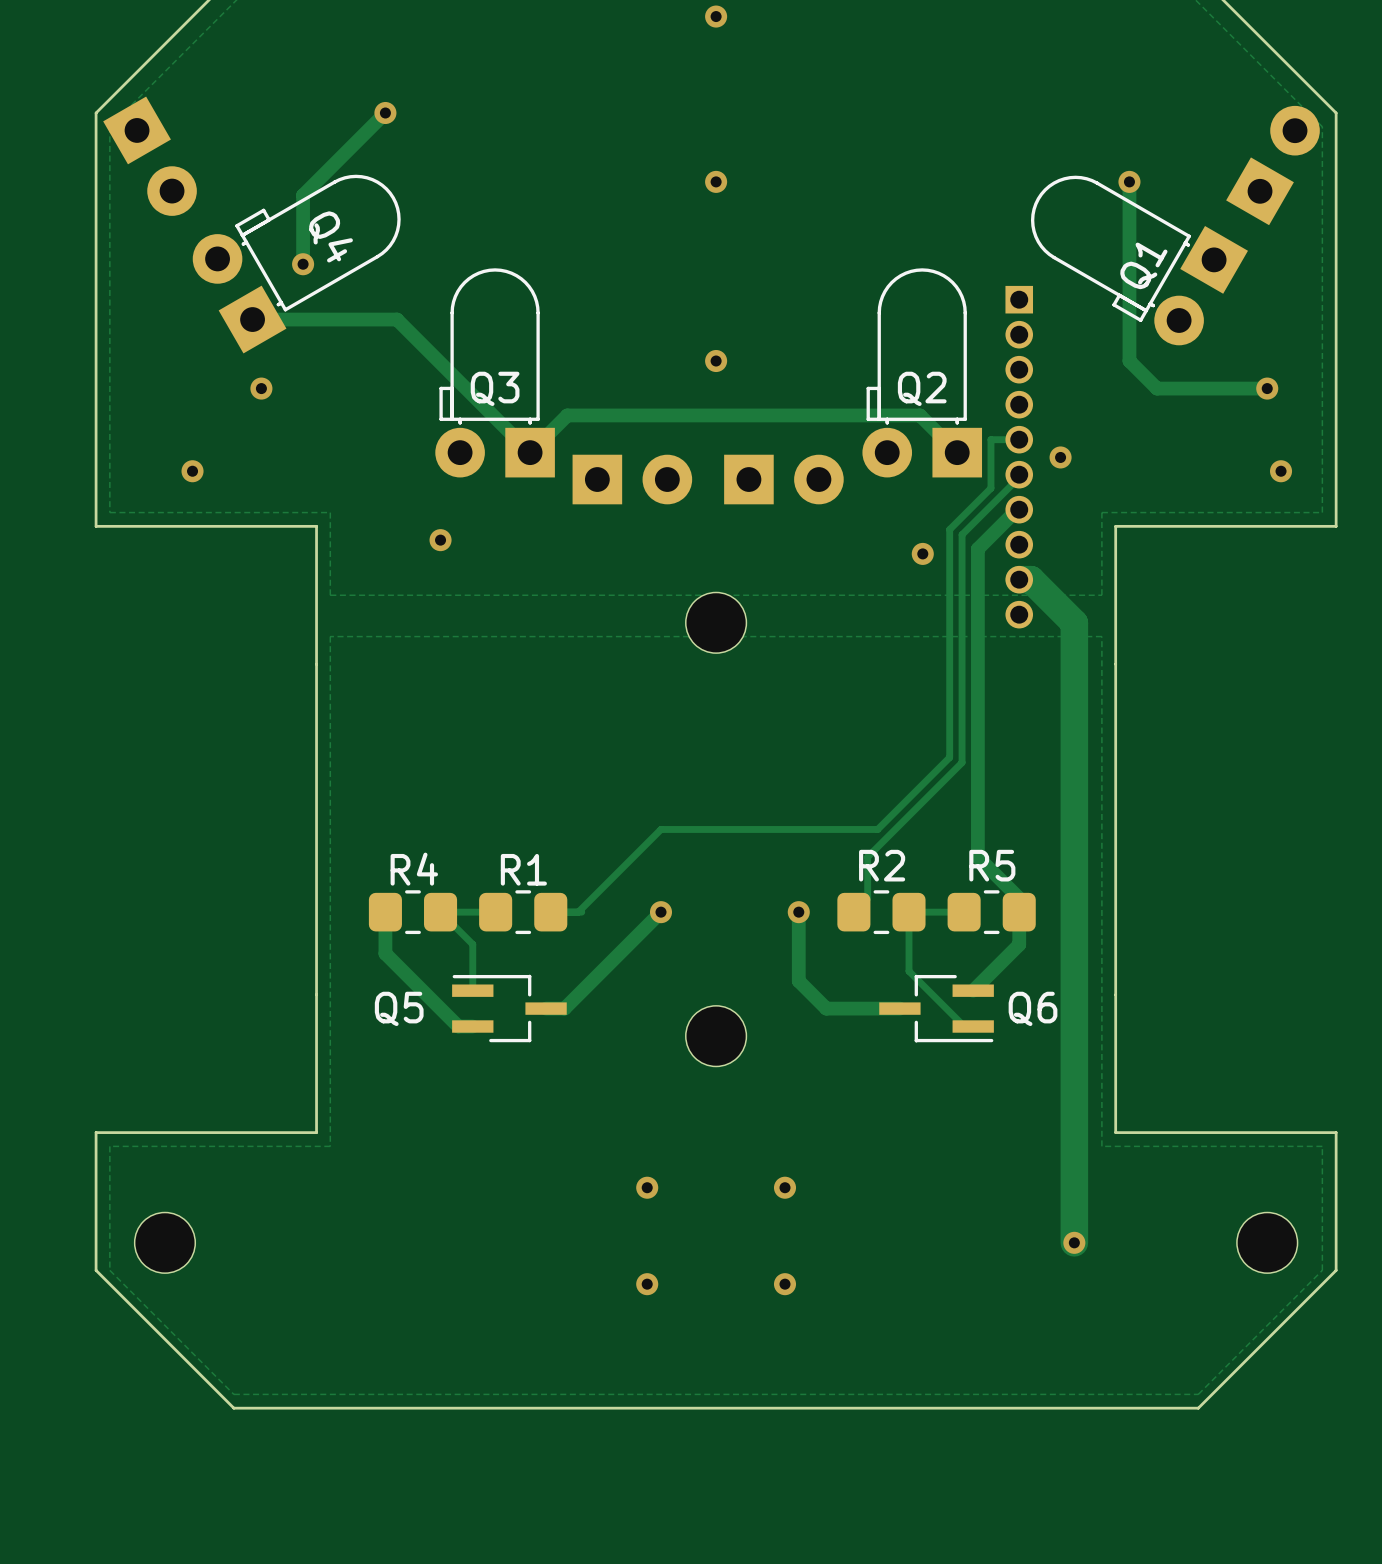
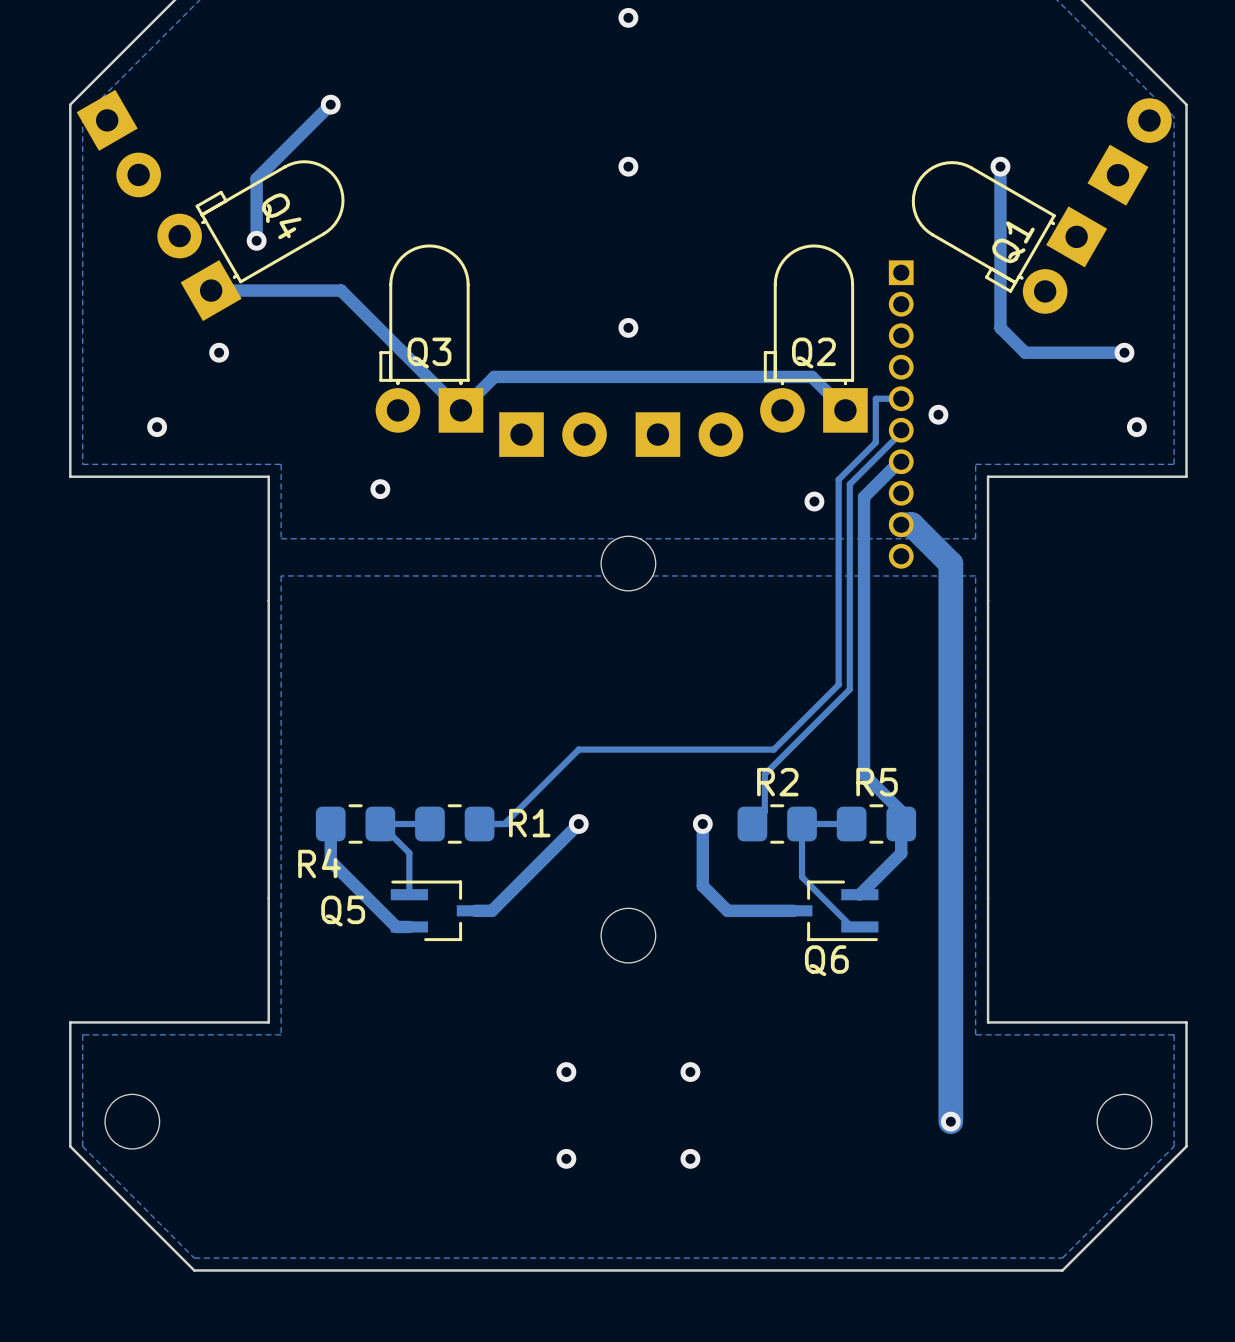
R4 name position: R4 (414, 869) -> R4 (319, 863)
R1 name position: R1 (523, 869) -> R1 (529, 823)
Q6 name position: Q6 (1033, 1008) -> Q6 (826, 960)

